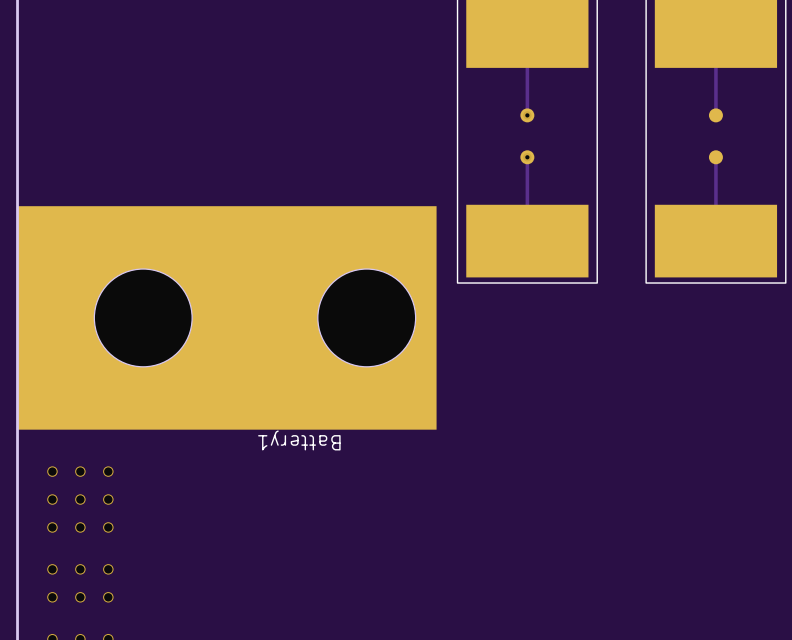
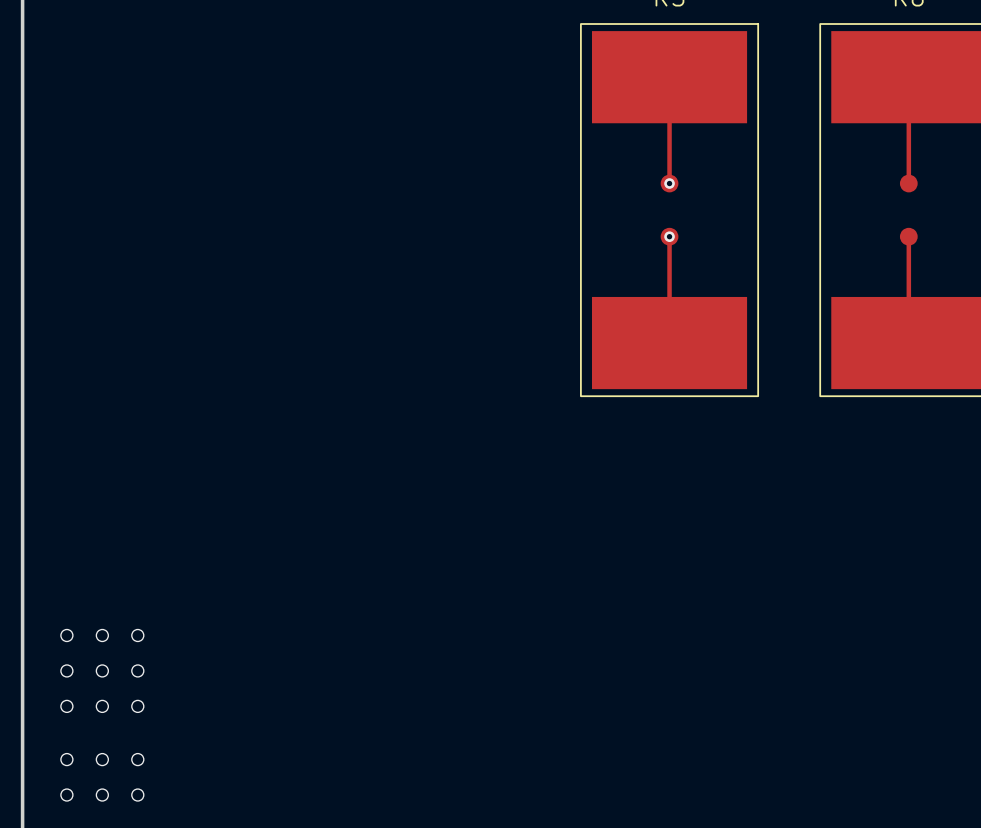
Battery1: (227, 317) -> none

